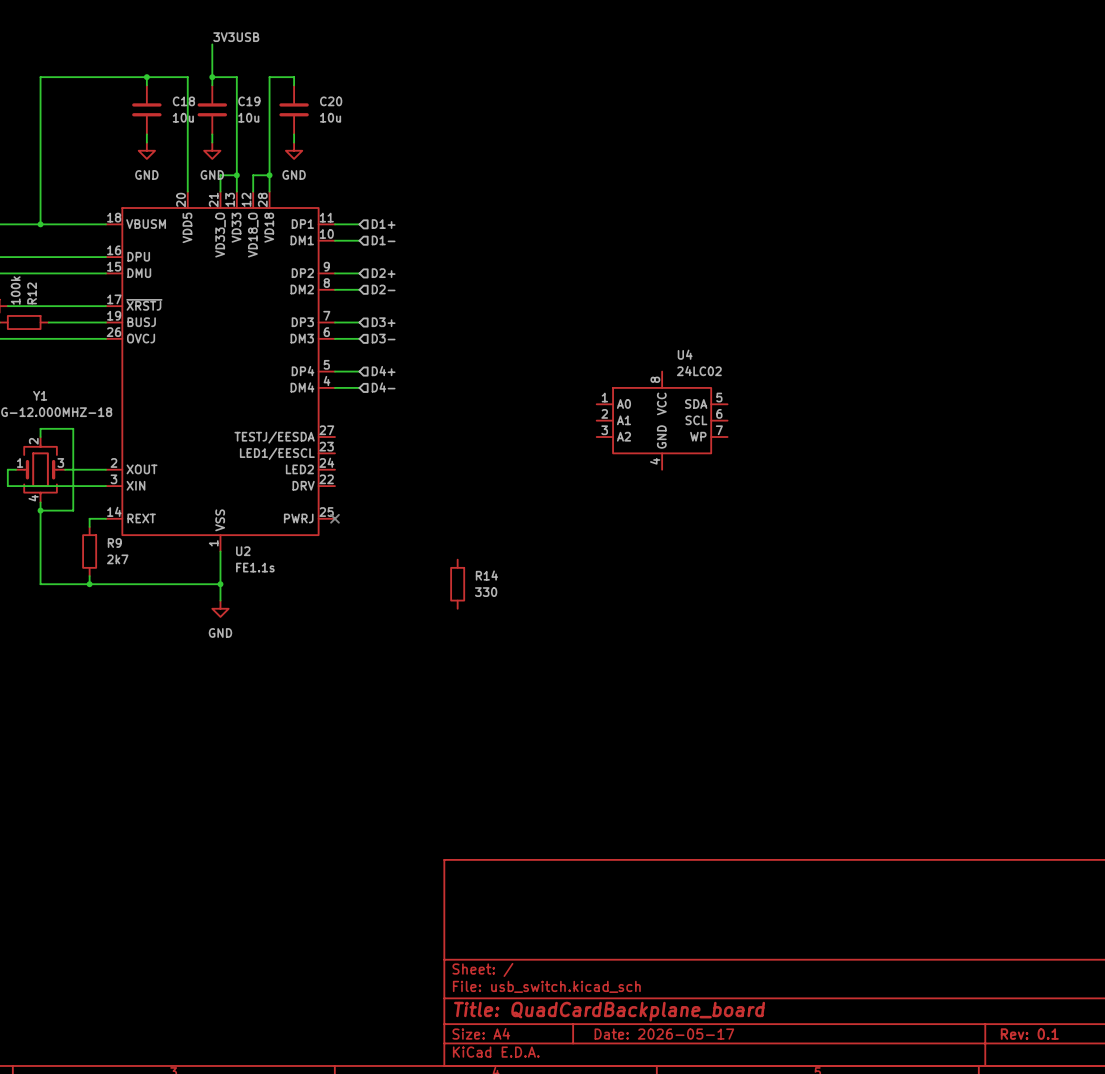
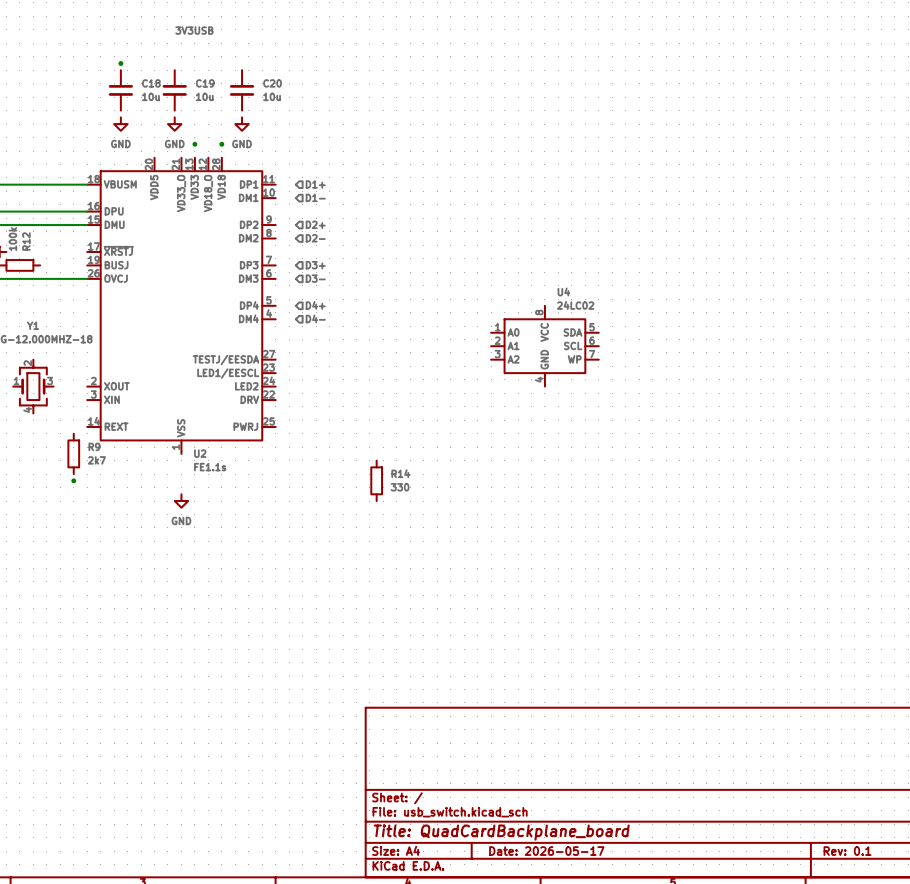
wire: (212, 44) (212, 85) -> none
wire: (146, 77) (146, 85) -> none
wire: (212, 77) (236, 77) (236, 191) -> none
junction: (212, 77) -> none
wire: (294, 85) (294, 77) (269, 77) (269, 191) -> none
wire: (146, 134) (146, 142) -> none
wire: (212, 134) (212, 142) -> none
wire: (294, 134) (294, 142) -> none
wire: (236, 175) (220, 175) (220, 191) -> none
wire: (269, 175) (253, 175) (253, 191) -> none
wire: (187, 191) (187, 77) (40, 77) (40, 224) -> none
junction: (40, 224) -> none
wire: (334, 224) (359, 224) -> none
wire: (334, 240) (359, 240) -> none
wire: (334, 273) (359, 273) -> none
wire: (334, 289) (359, 289) -> none
wire: (7, 306) (105, 306) -> none
wire: (48, 322) (105, 322) -> none
wire: (334, 322) (359, 322) -> none
wire: (334, 338) (359, 338) -> none
wire: (334, 371) (359, 371) -> none
wire: (334, 387) (359, 387) -> none
wire: (40, 437) (40, 428) (73, 428) (73, 510) (40, 510) -> none
wire: (16, 469) (7, 469) (7, 486) (105, 486) -> none
wire: (65, 469) (105, 469) -> none
wire: (40, 502) (40, 584) (220, 584) -> none
junction: (40, 510) -> none
wire: (105, 518) (89, 518) (89, 526) -> none
no-connect mark: (334, 518) -> none
wire: (220, 551) (220, 600) -> none
wire: (89, 576) (89, 584) -> none
junction: (220, 584) -> none

